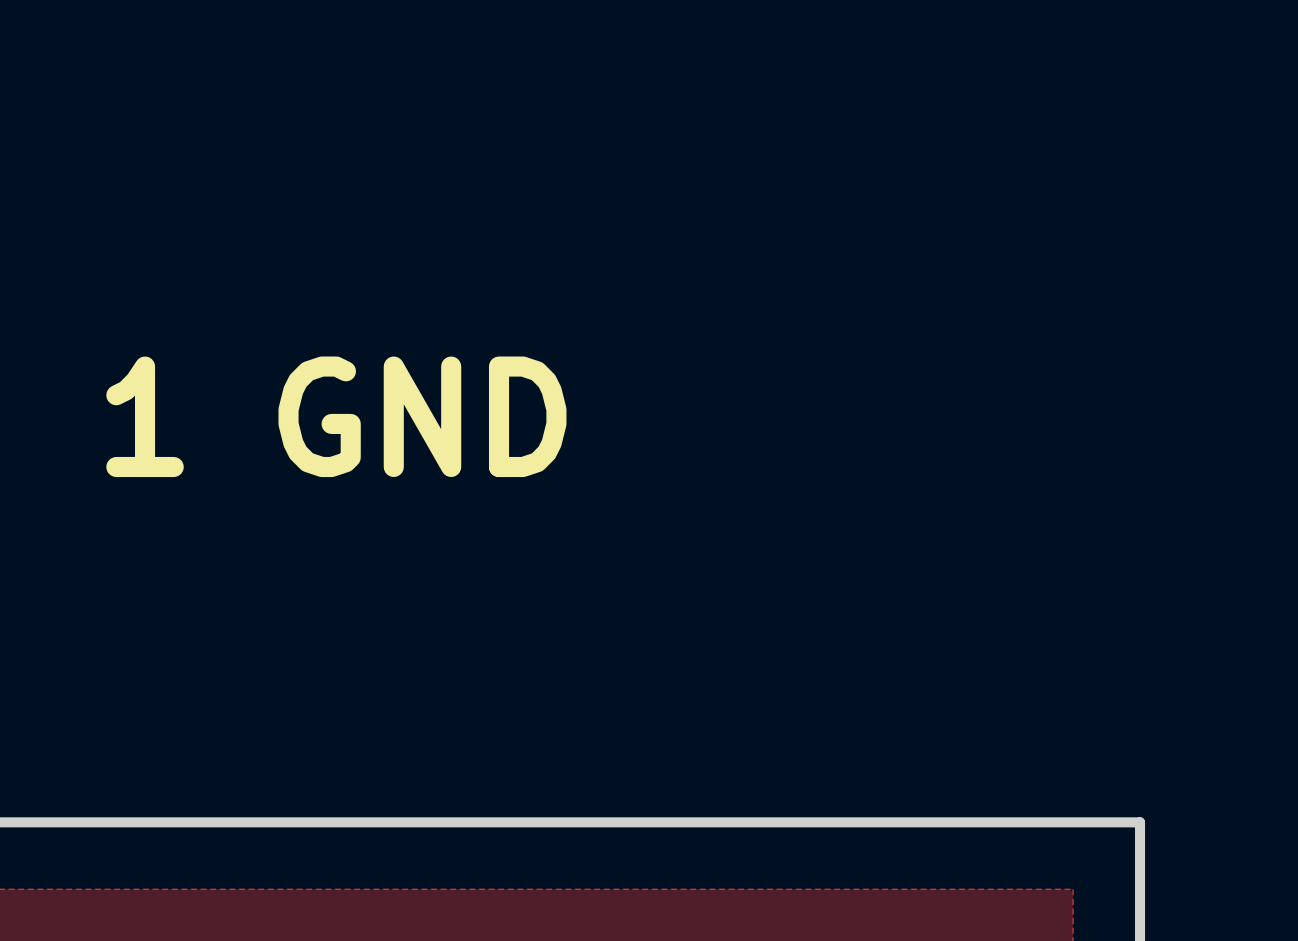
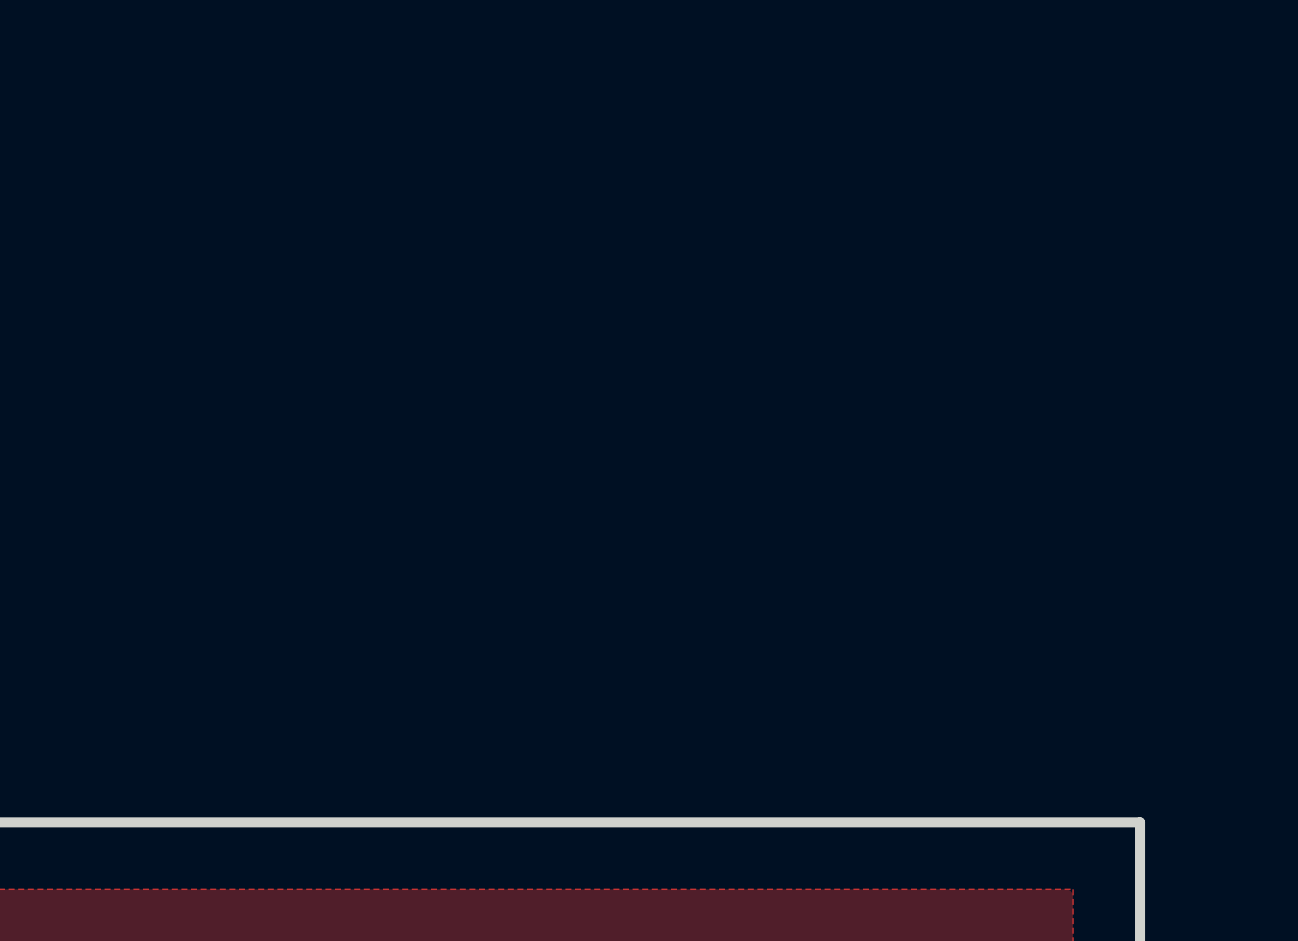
text: 1 GND (336, 416) -> none

